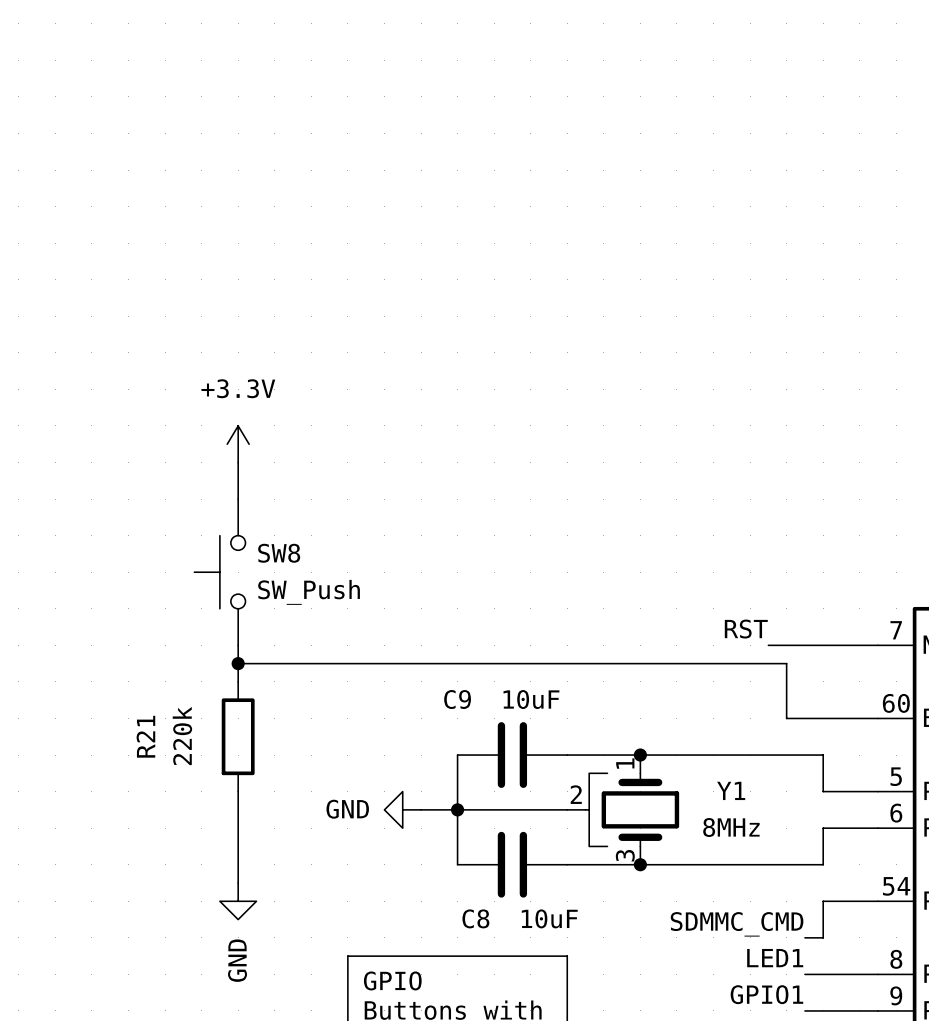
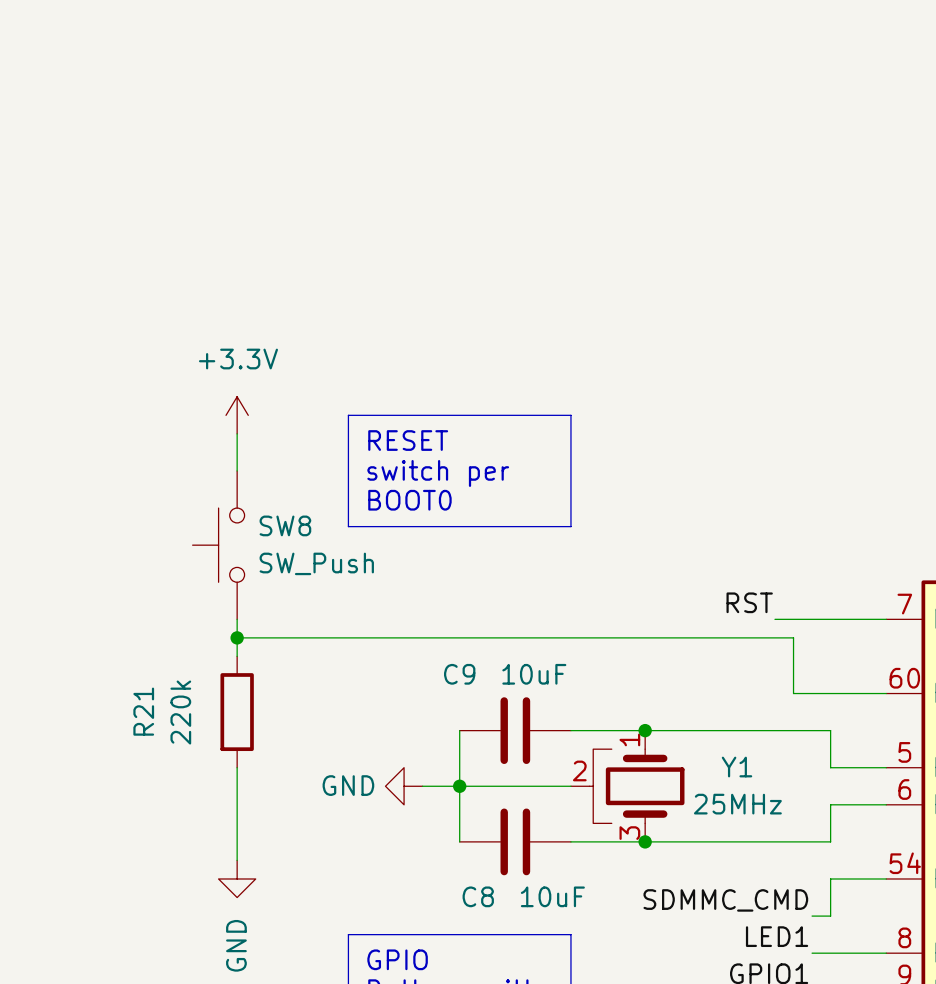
line: none -> (348, 415) (570, 415) (570, 526) (348, 526) (348, 415)
text: none -> RESET (408, 440)
text: none -> switch per (438, 473)
text: none -> BOOT0 (409, 500)
Y1 value: 8MHz (731, 827) -> 25MHz (737, 804)

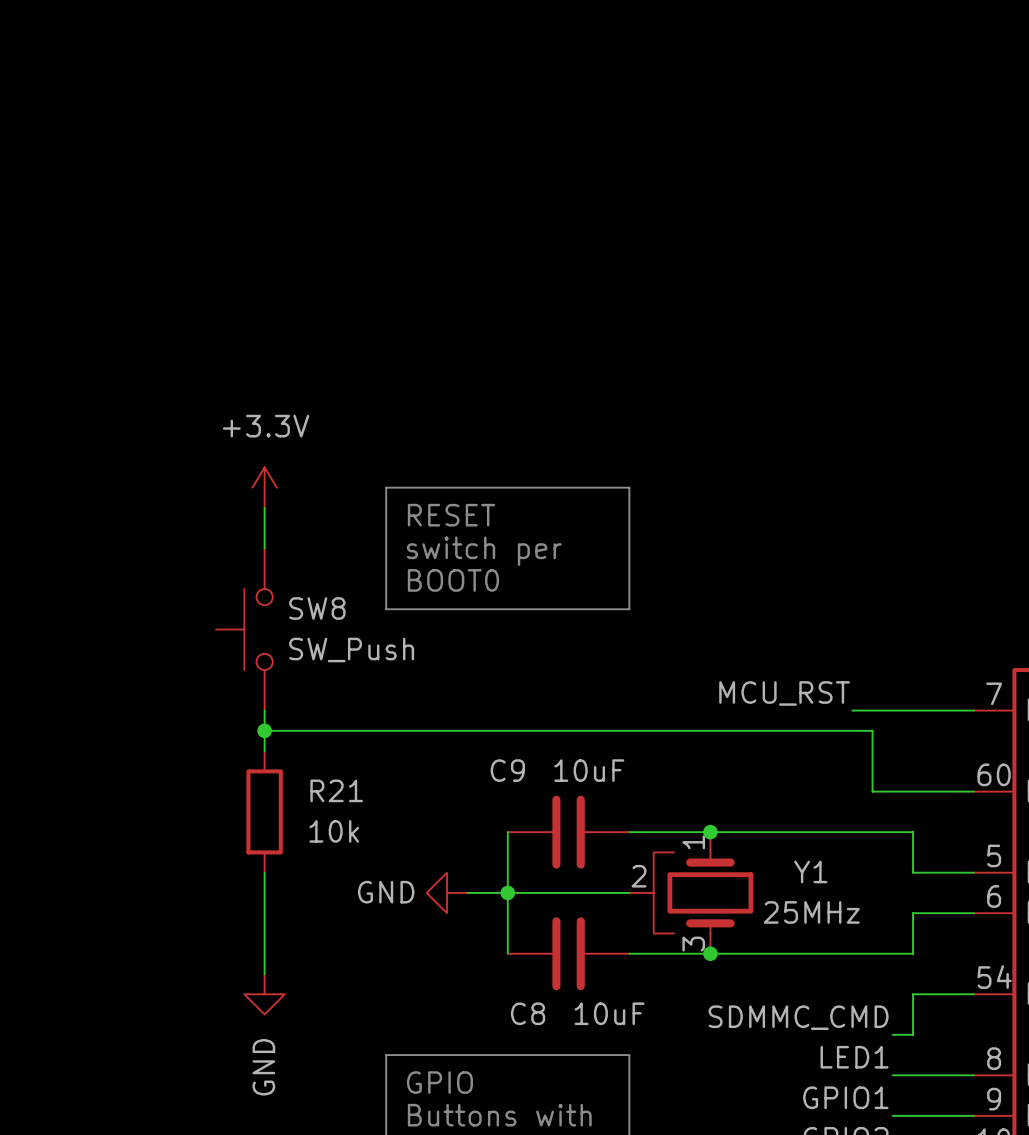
label: RST (749, 602) -> MCU_RST (784, 693)
R21 name rotation: 0° (143, 711) -> 90° clockwise (336, 790)
R21 name position: R21 (143, 711) -> R21 (336, 790)
R21 value: 220k (180, 712) -> 10k (334, 831)

